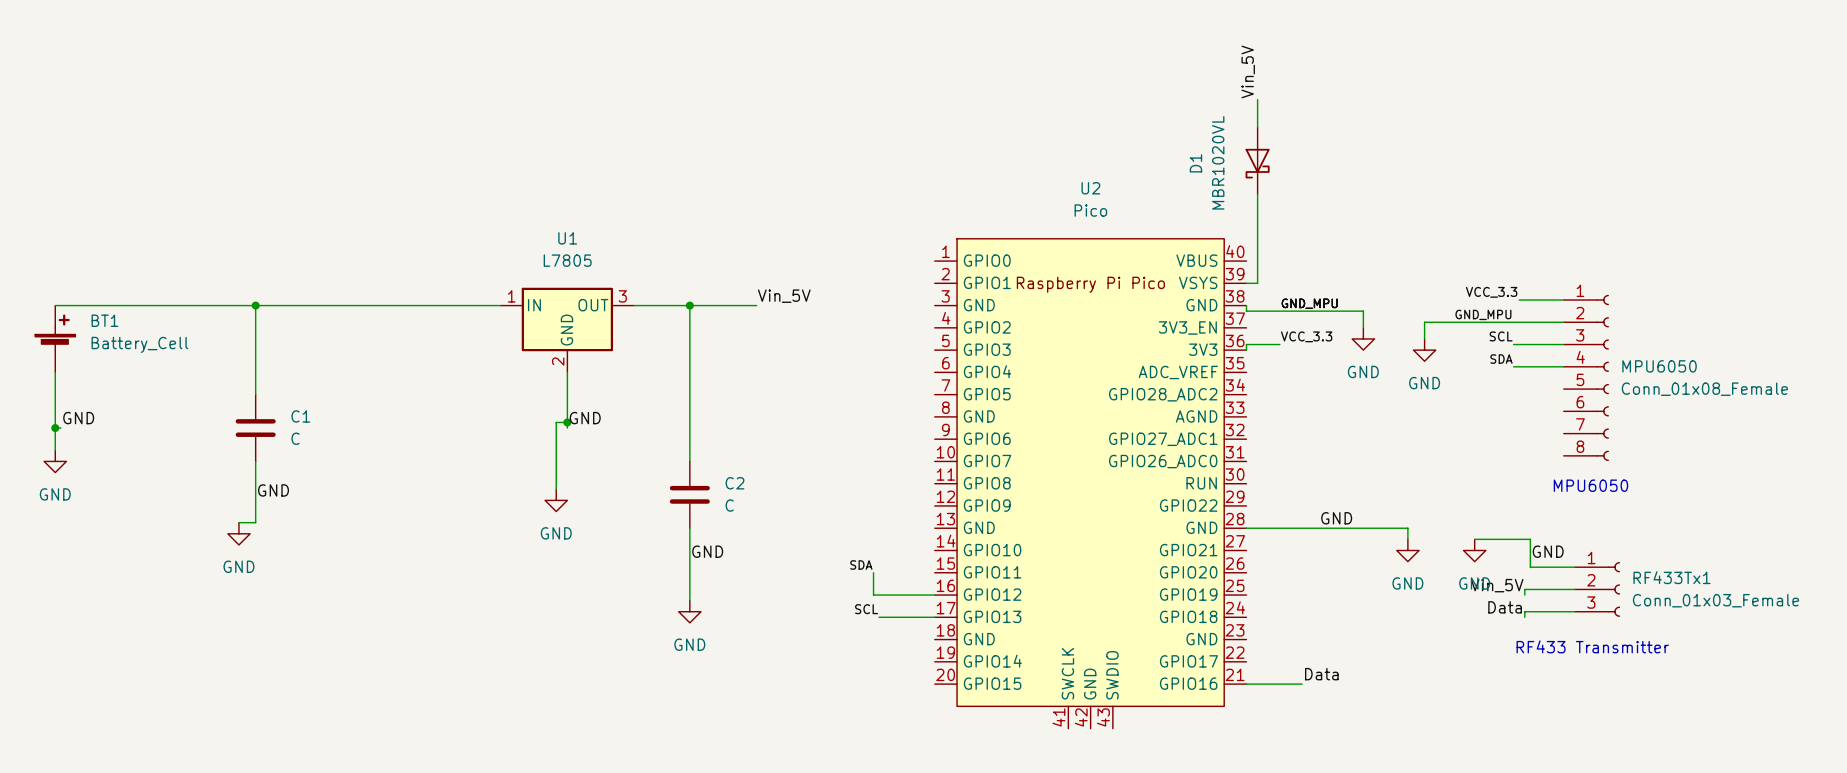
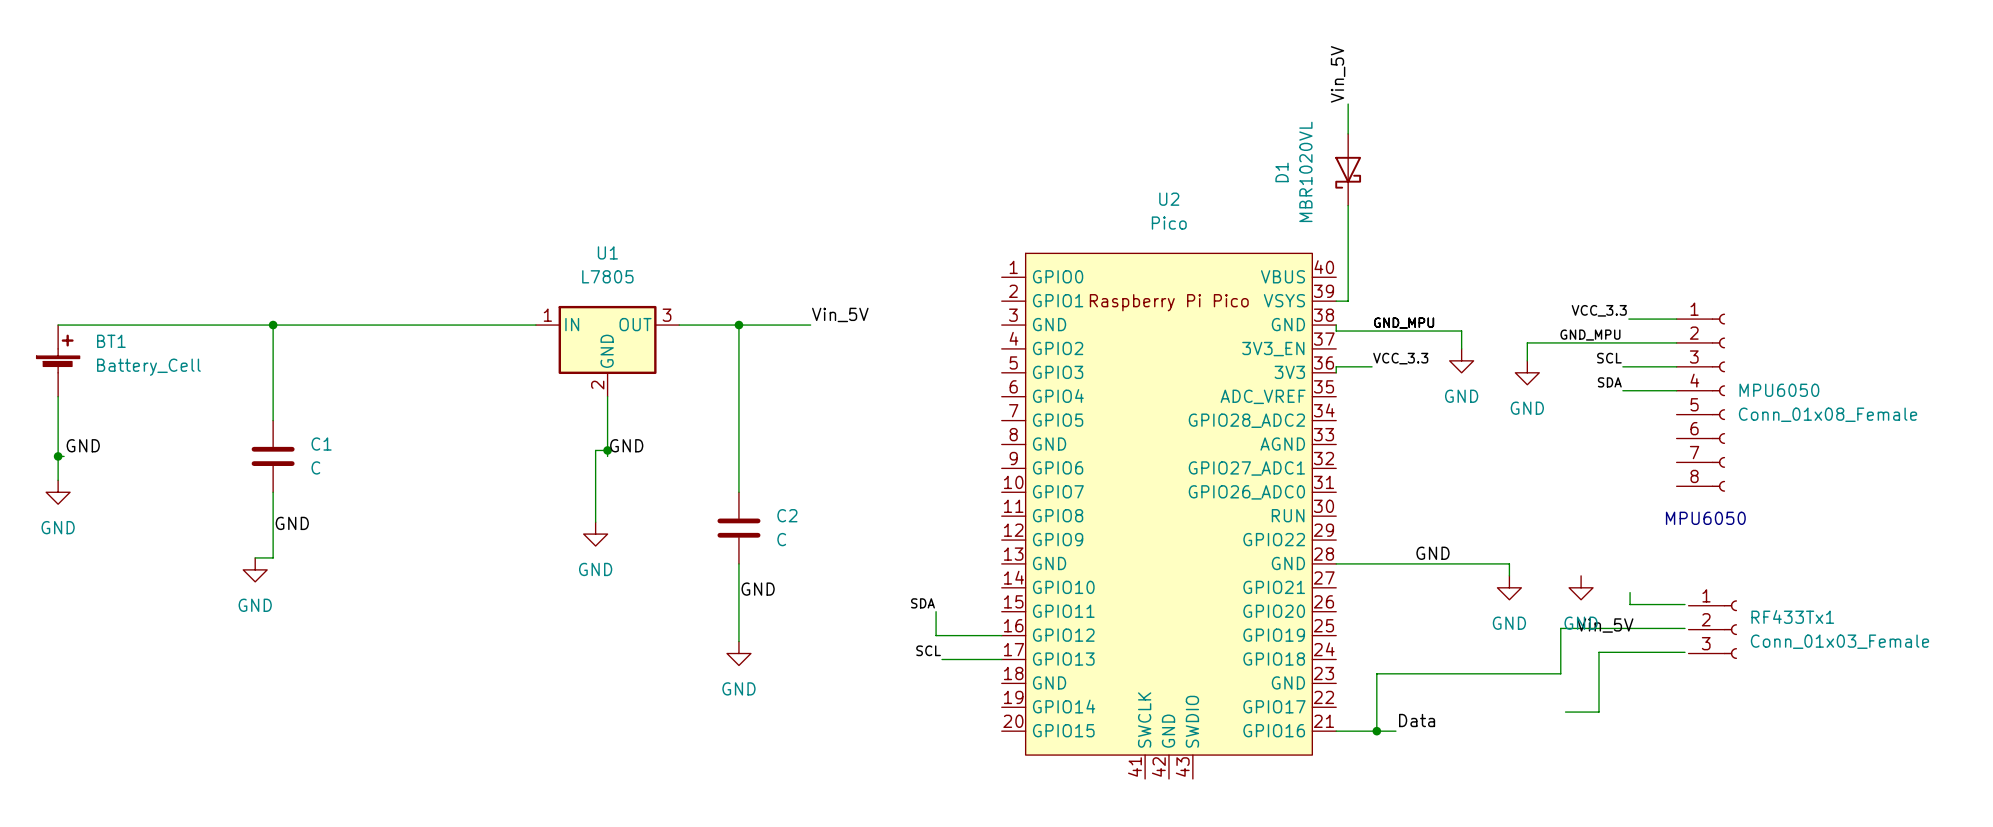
wire: (1474, 539) (1530, 539) (1530, 567) (1574, 567) -> none
label: GND (1548, 551) -> none
wire: none -> (1630, 592) (1630, 604) (1685, 604)
wire: none -> (1685, 628) (1560, 628) (1560, 673) (1376, 673) (1376, 731)
wire: (1574, 589) (1524, 589) (1524, 595) -> none
label: Data (1505, 607) -> none
wire: none -> (1685, 652) (1599, 652) (1599, 712) (1565, 712)
wire: (1574, 611) (1524, 611) (1524, 617) -> none
text: RF433 Transmitter (1592, 646) -> none
junction: none -> (1376, 731)

